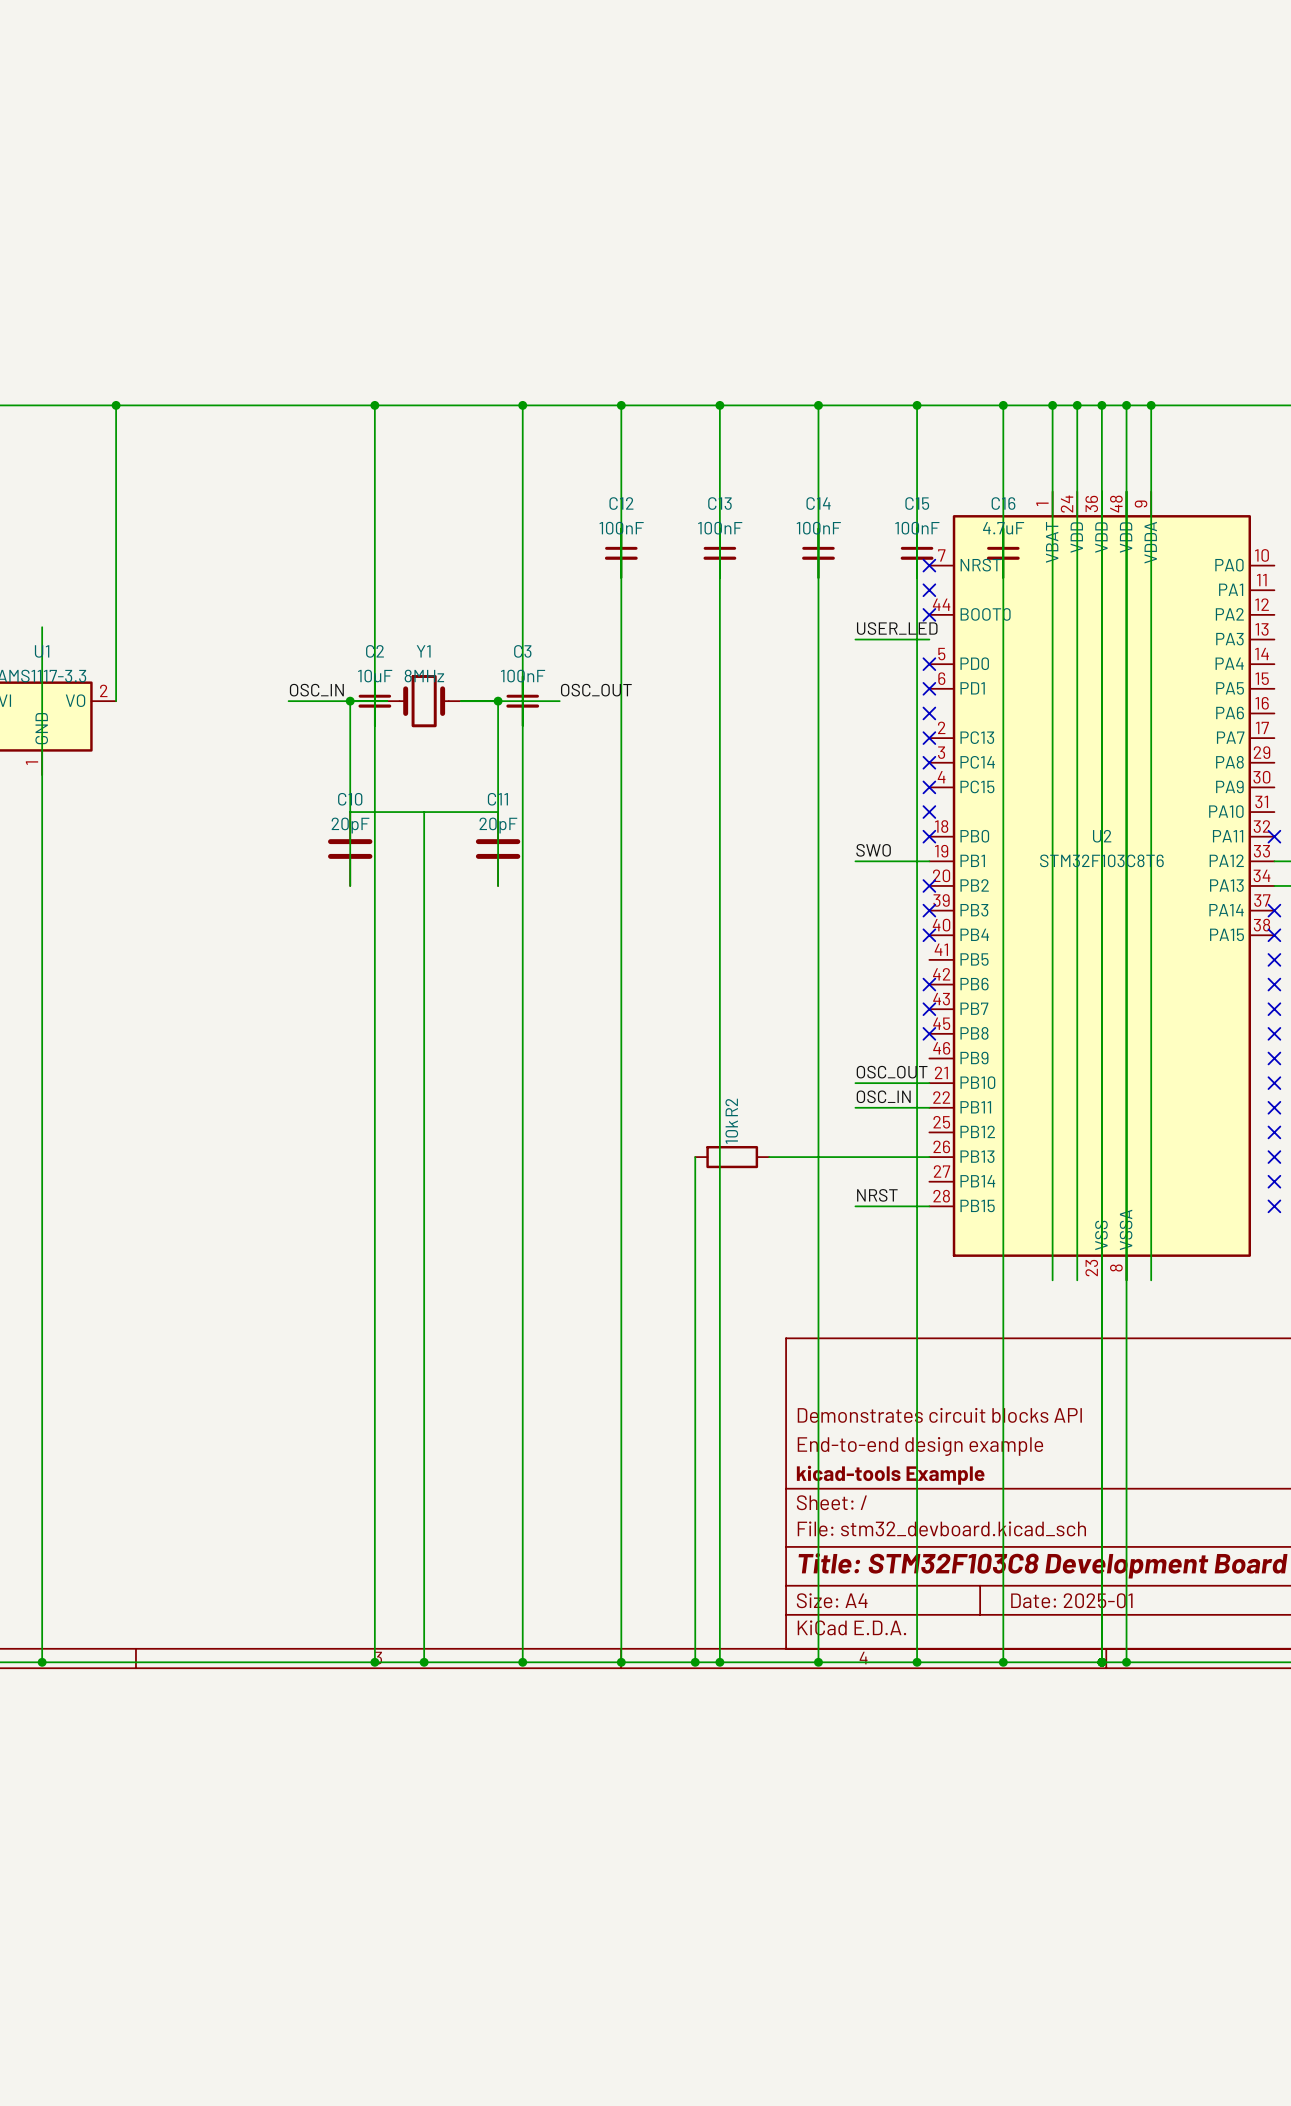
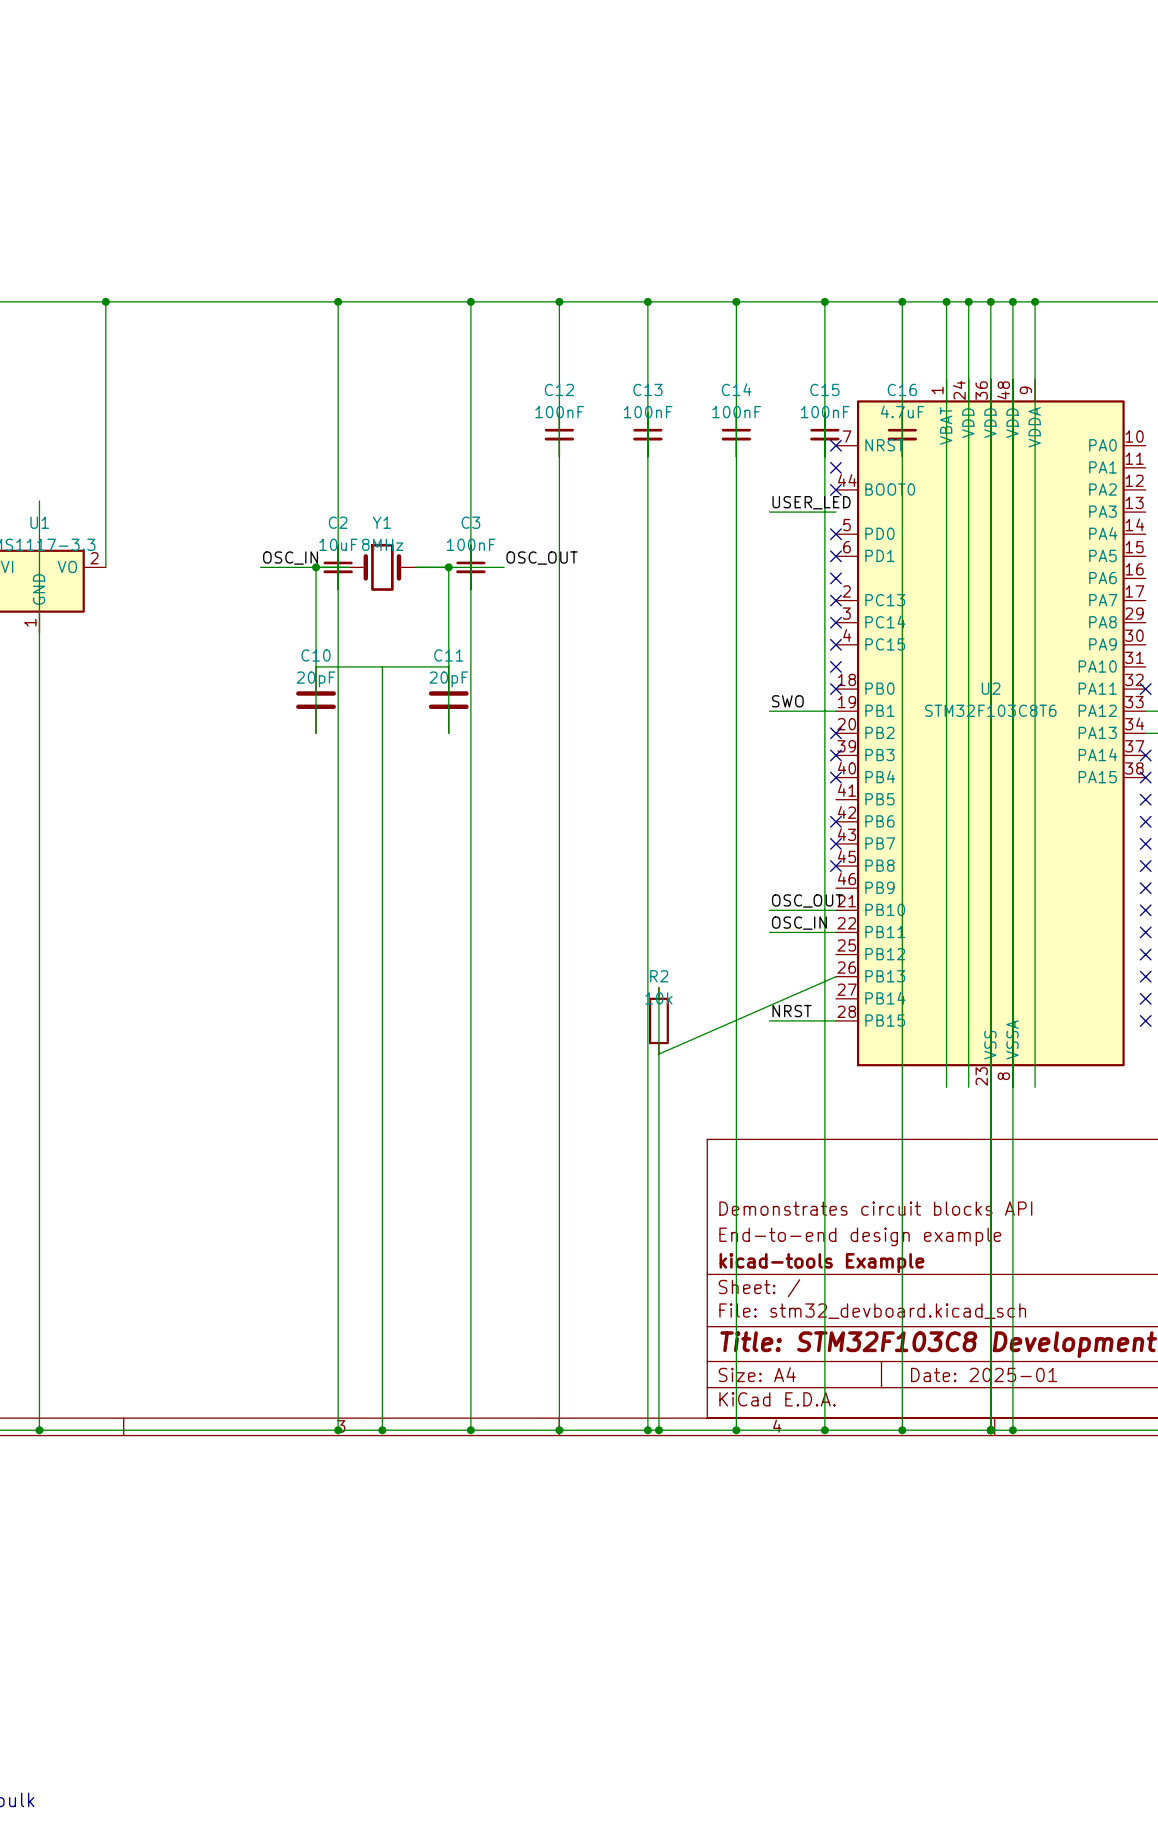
wire: (695, 1157) (695, 1662) -> none
R2 rotation: 0° (732, 1157) -> 90° clockwise (658, 1020)
R2 position: (732, 1157) -> (658, 1020)
wire: (769, 1157) (929, 1157) -> (658, 1054) (835, 976)
wire: none -> (658, 987) (658, 1430)
junction position: (695, 1662) -> (658, 1430)

